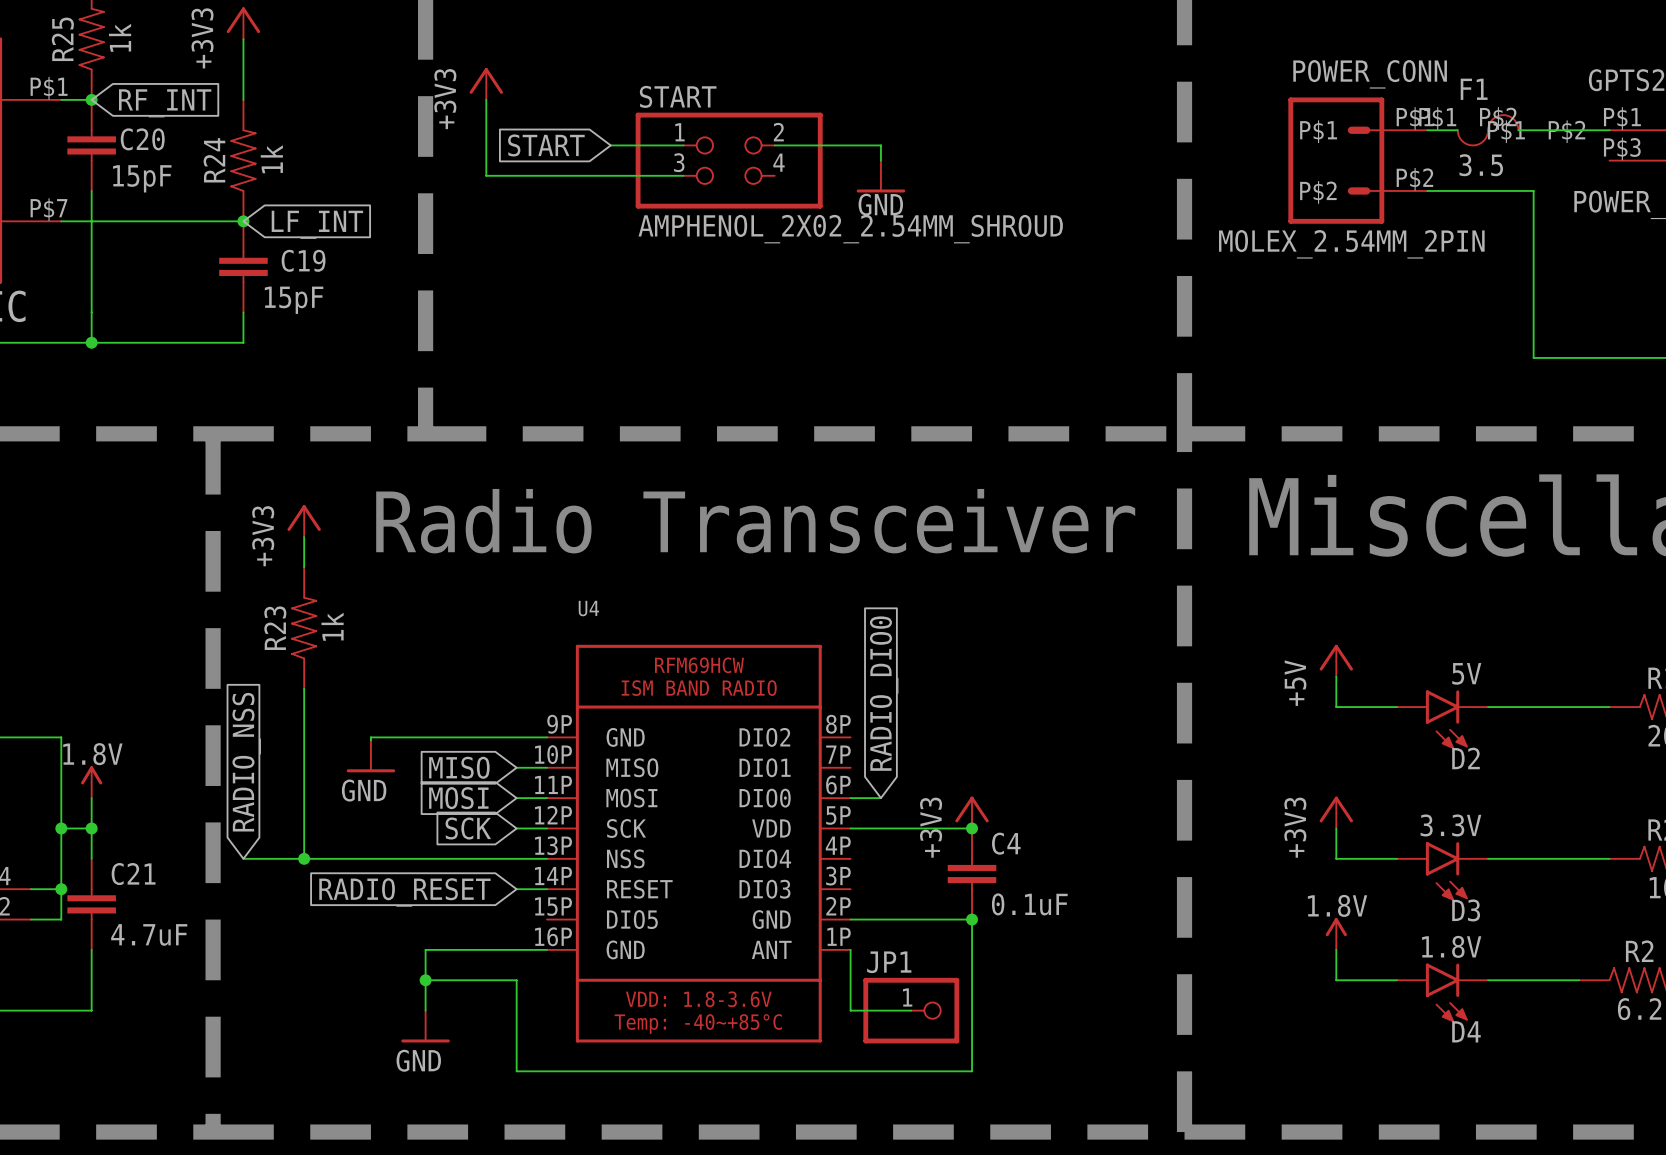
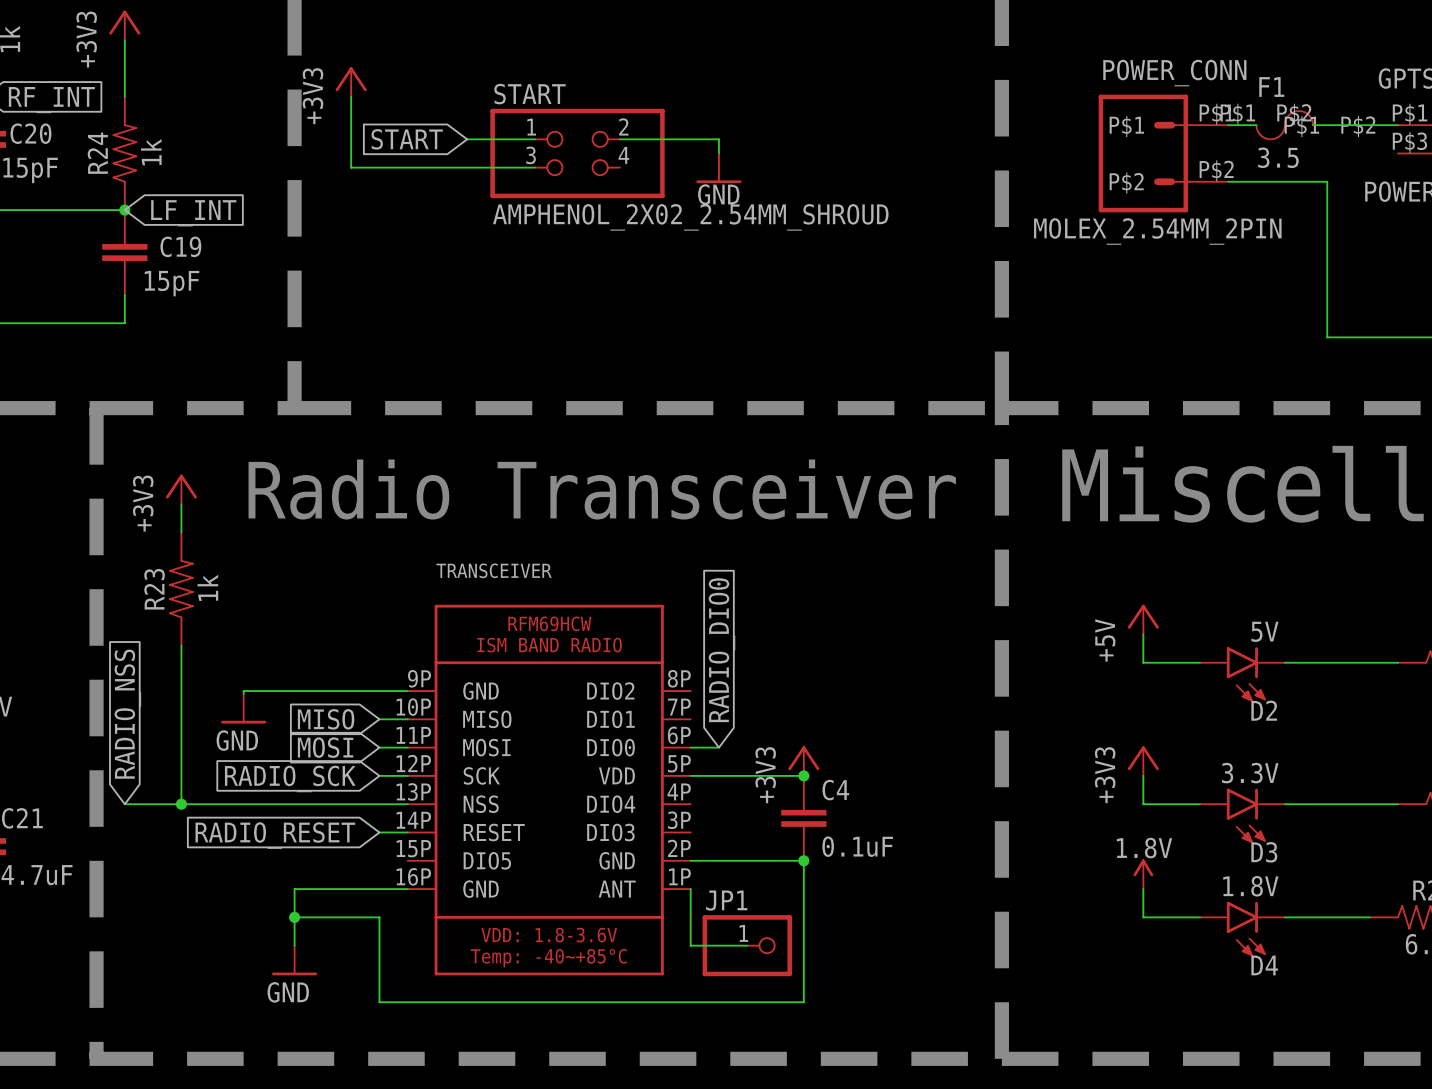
U4 name: U4 (588, 608) -> TRANSCEIVER (494, 570)
global label: SCK (468, 828) -> RADIO_SCK (290, 778)

